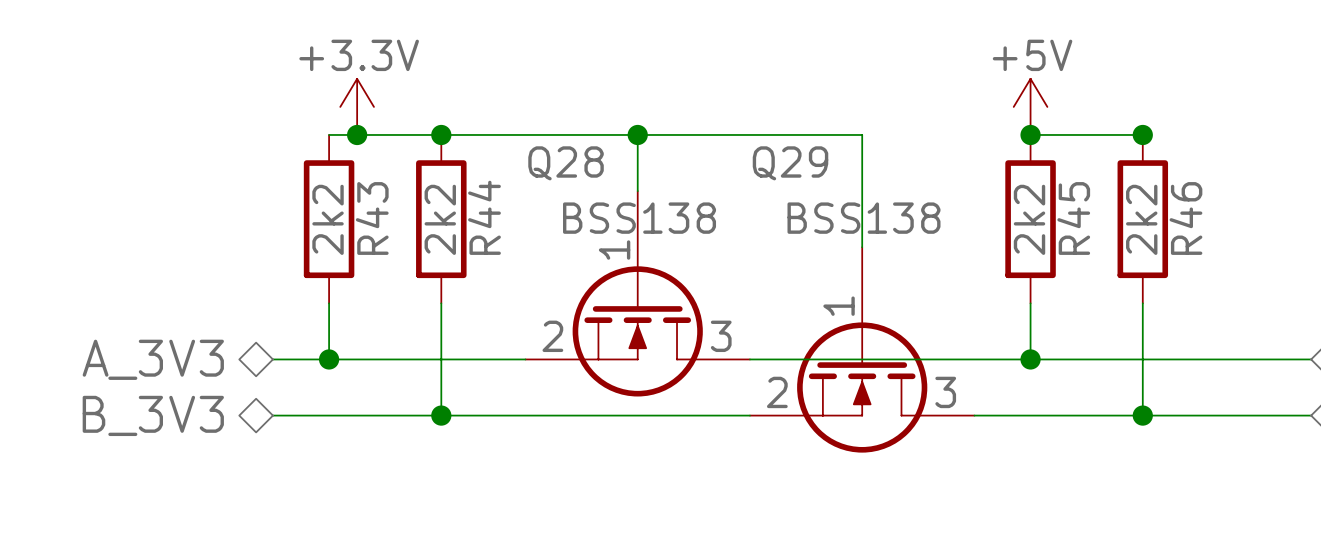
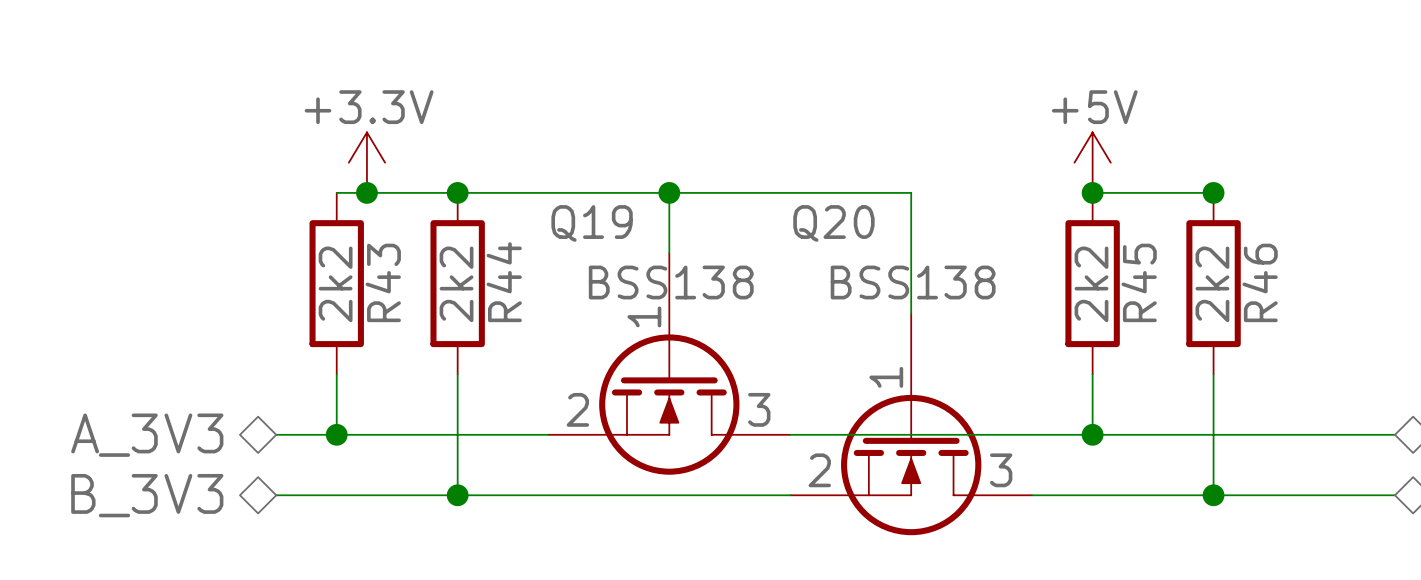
Q28 name: Q28 (566, 163) -> Q19 (592, 223)
Q29 name: Q29 (790, 163) -> Q20 (833, 223)

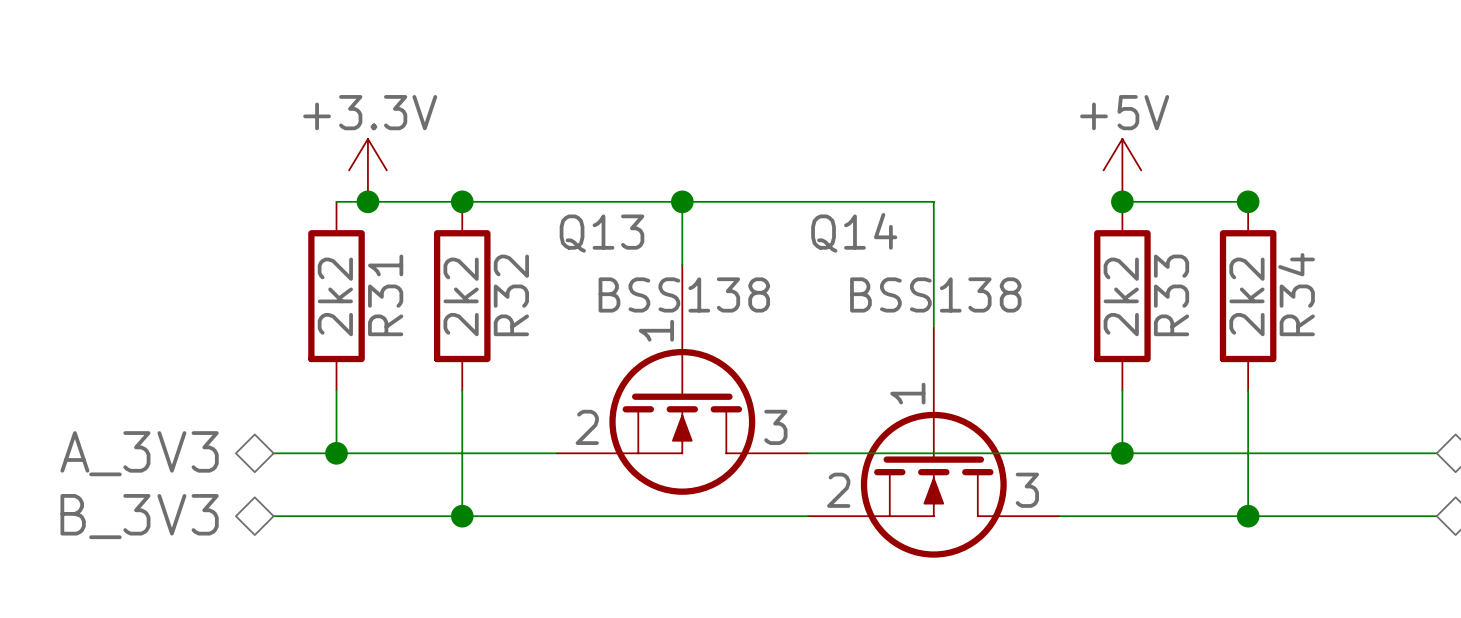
Q19 name: Q19 (592, 223) -> Q13 (601, 233)
Q20 name: Q20 (833, 223) -> Q14 (854, 232)
R43 name: R43 (383, 282) -> R31 (385, 295)
R44 name: R44 (504, 282) -> R32 (511, 295)
R45 name: R45 (1139, 282) -> R33 (1171, 295)
R46 name: R46 (1260, 282) -> R34 (1296, 294)

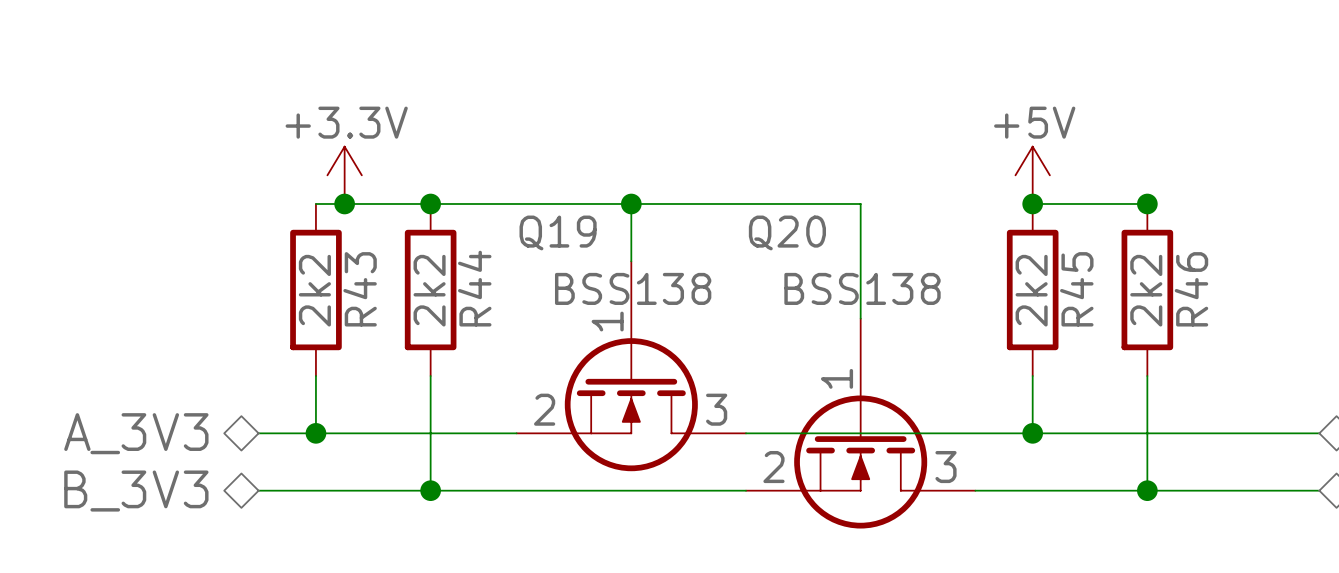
Q14 name: Q14 (854, 232) -> Q20 (787, 232)
Q13 name: Q13 (601, 233) -> Q19 (558, 232)
R34 name: R34 (1296, 294) -> R46 (1191, 289)
R31 name: R31 (385, 295) -> R43 (360, 289)
R32 name: R32 (511, 295) -> R44 (474, 288)
R33 name: R33 (1171, 295) -> R45 (1076, 289)

